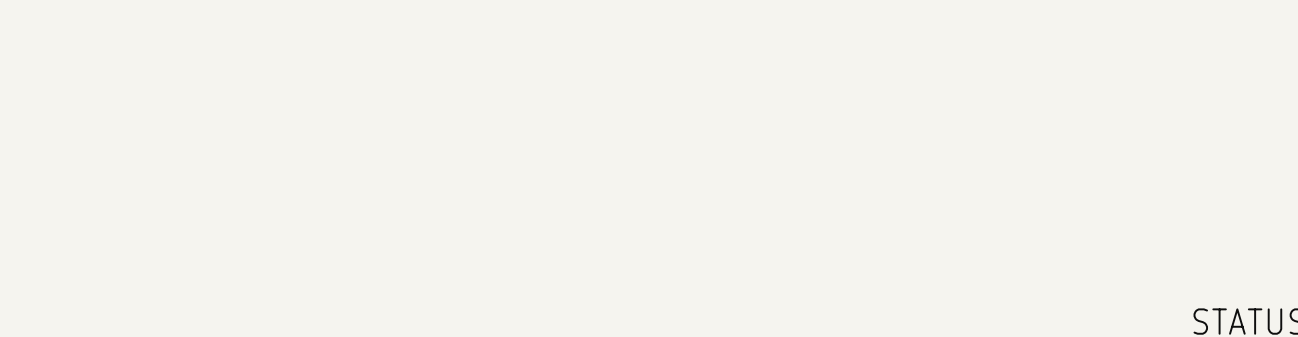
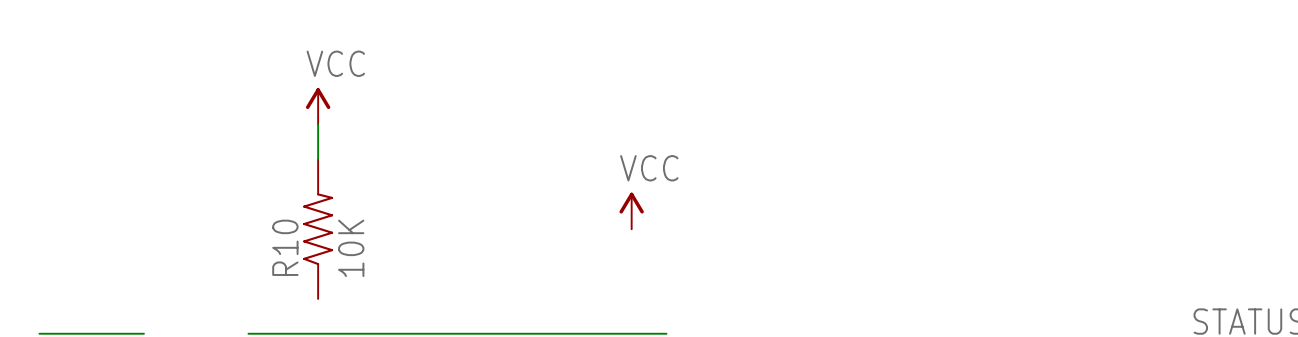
power symbol: none -> VCC (318, 106)
wire: none -> (318, 124) (318, 159)
power symbol: none -> VCC (631, 210)
R10: none -> 10K (318, 229)
wire: none -> (39, 333) (143, 333)
wire: none -> (248, 333) (666, 333)

